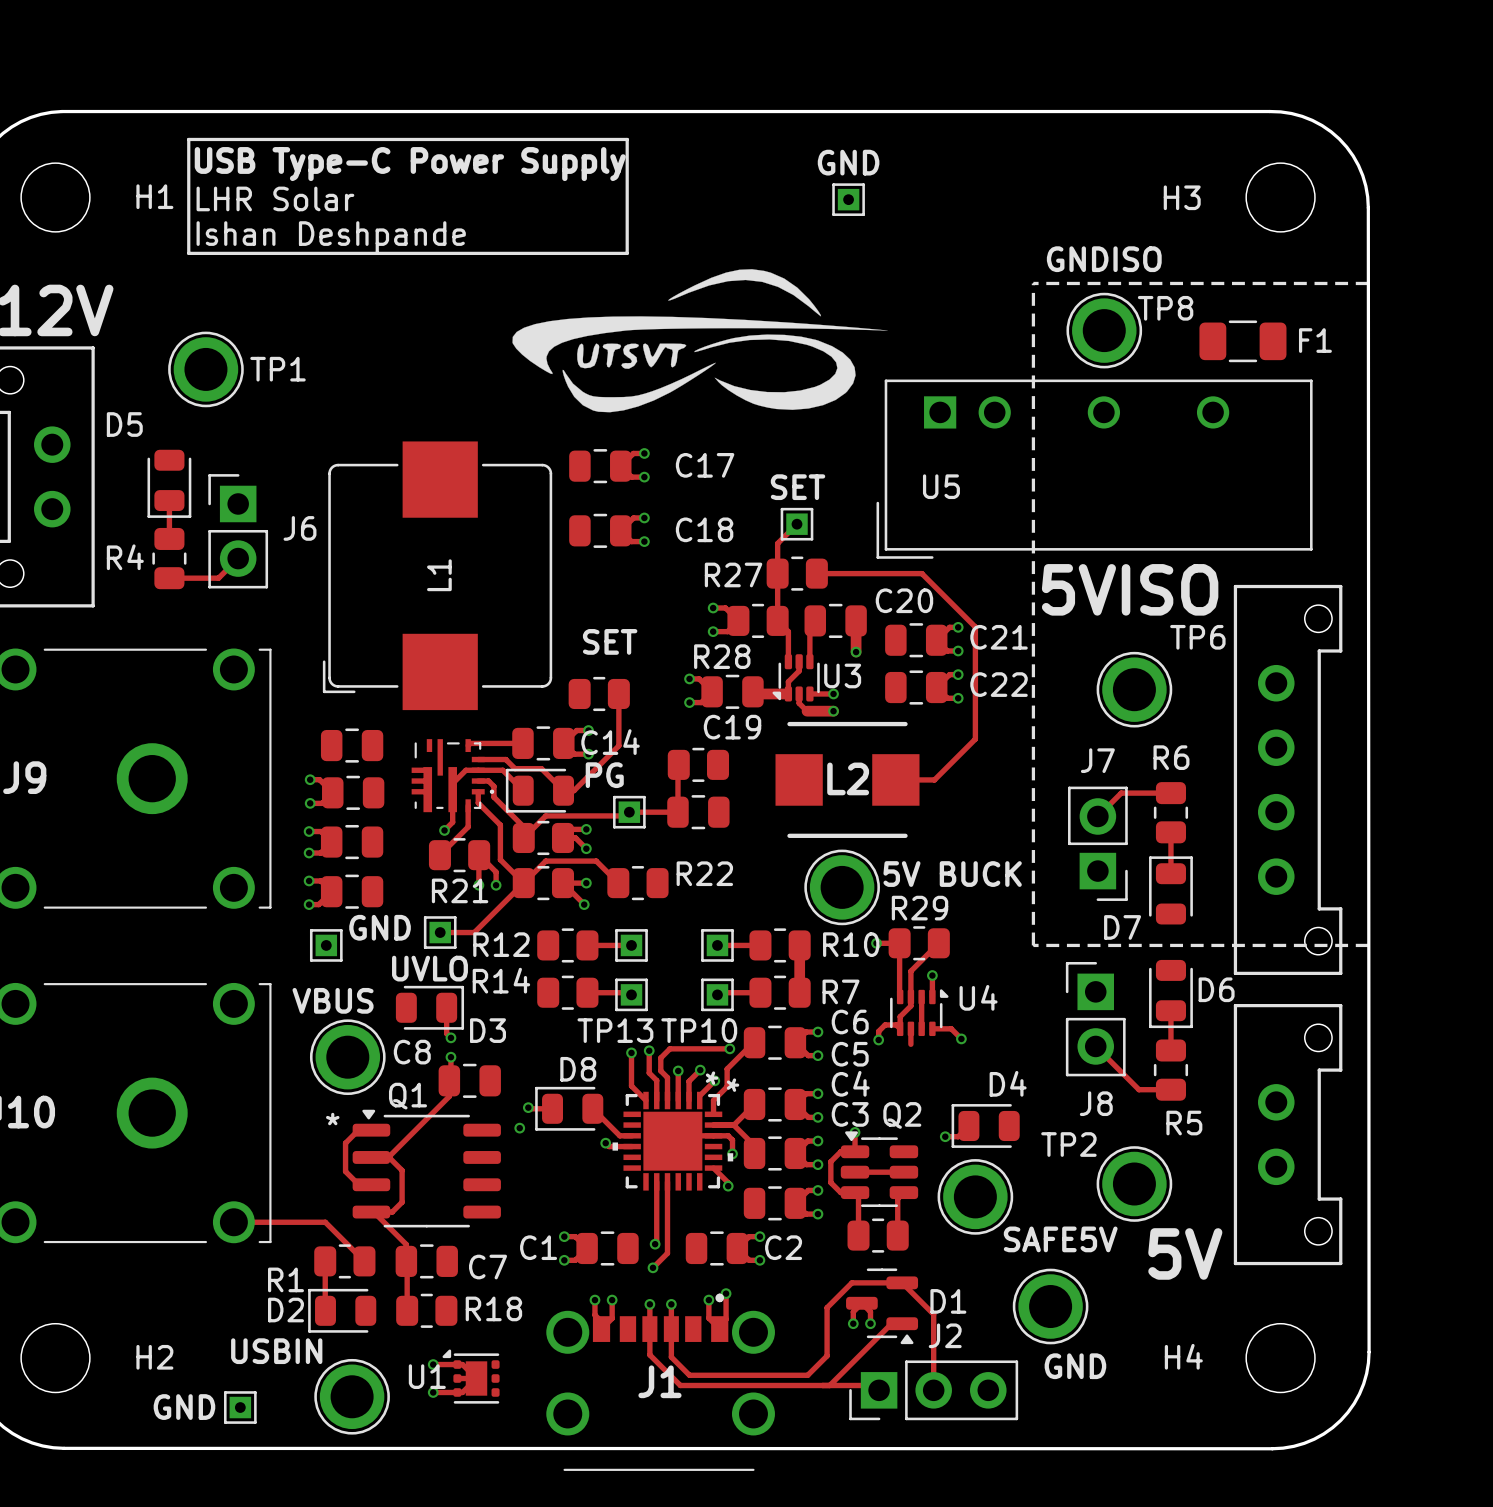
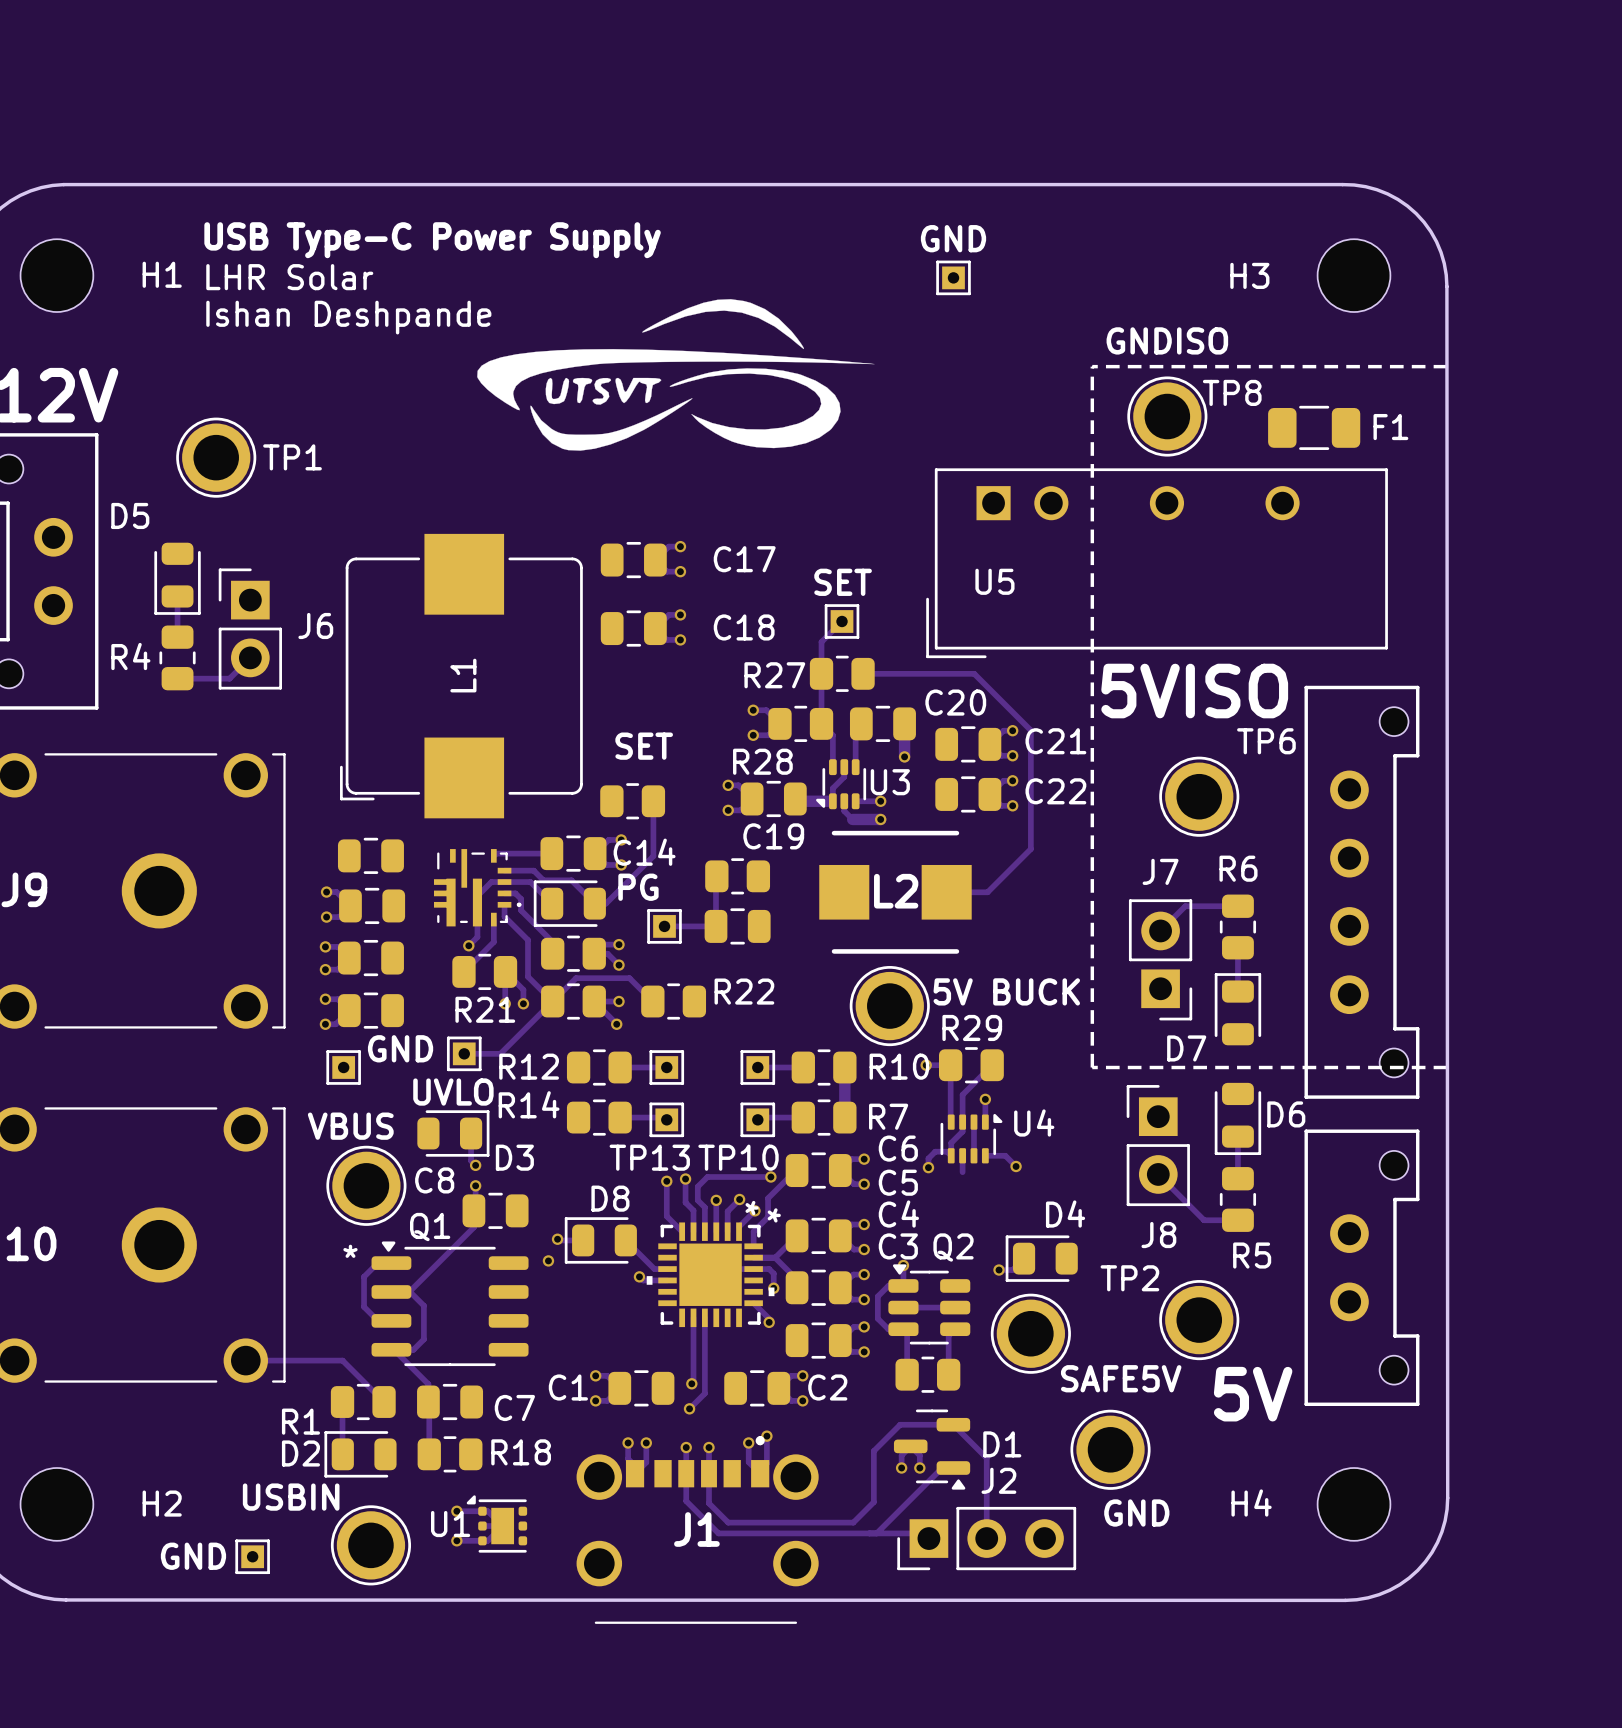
line: (188, 139) (627, 139) (627, 253) (188, 253) (188, 139) -> none
text position: GND (848, 162) -> GND (953, 238)
part position: (848, 199) -> (953, 277)
drawing position: (700, 340) -> (675, 374)
track: (629, 812) (625, 815) (545, 815) (523, 837) -> none

